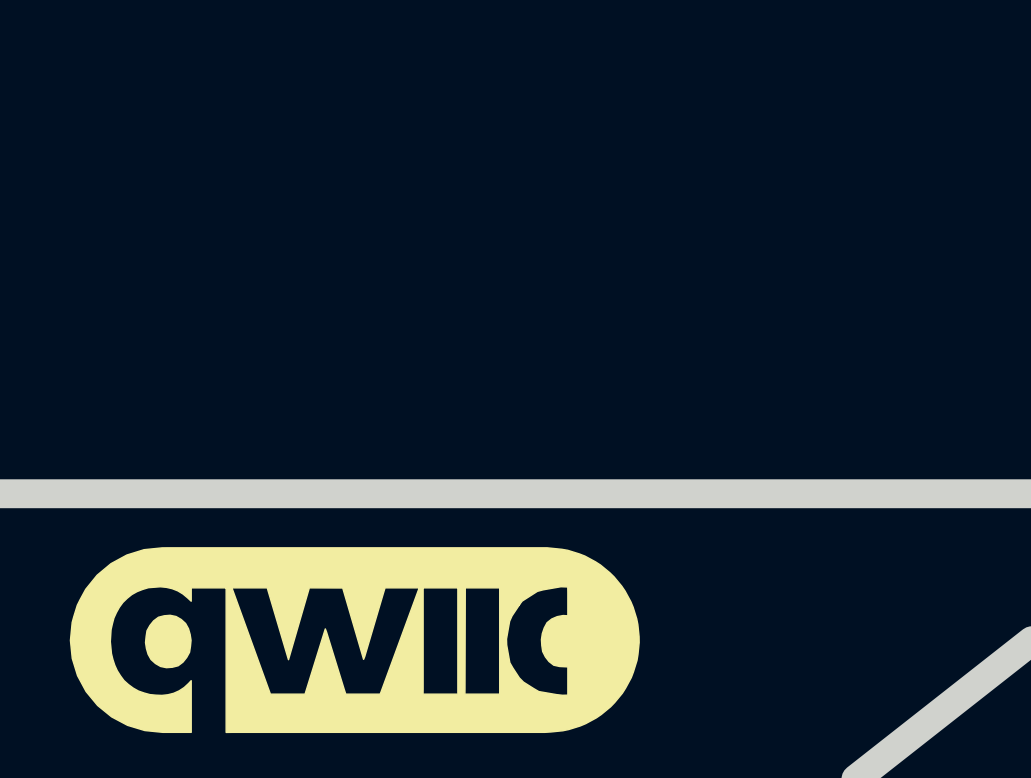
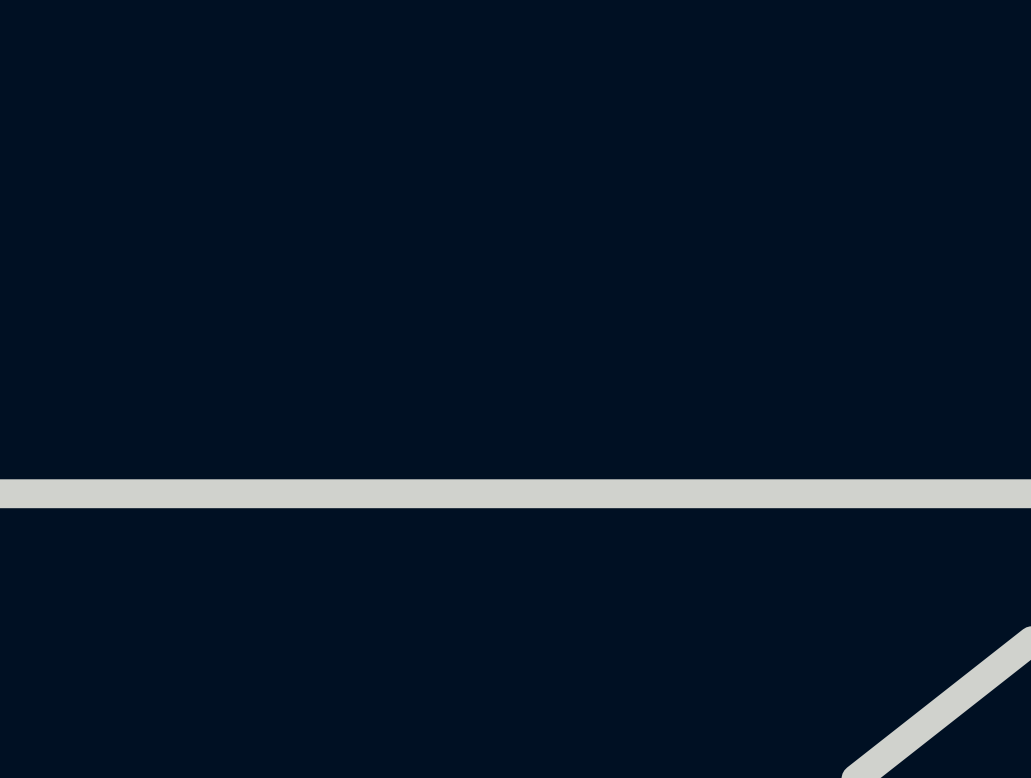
drawing: [69, 547, 640, 734] -> none

